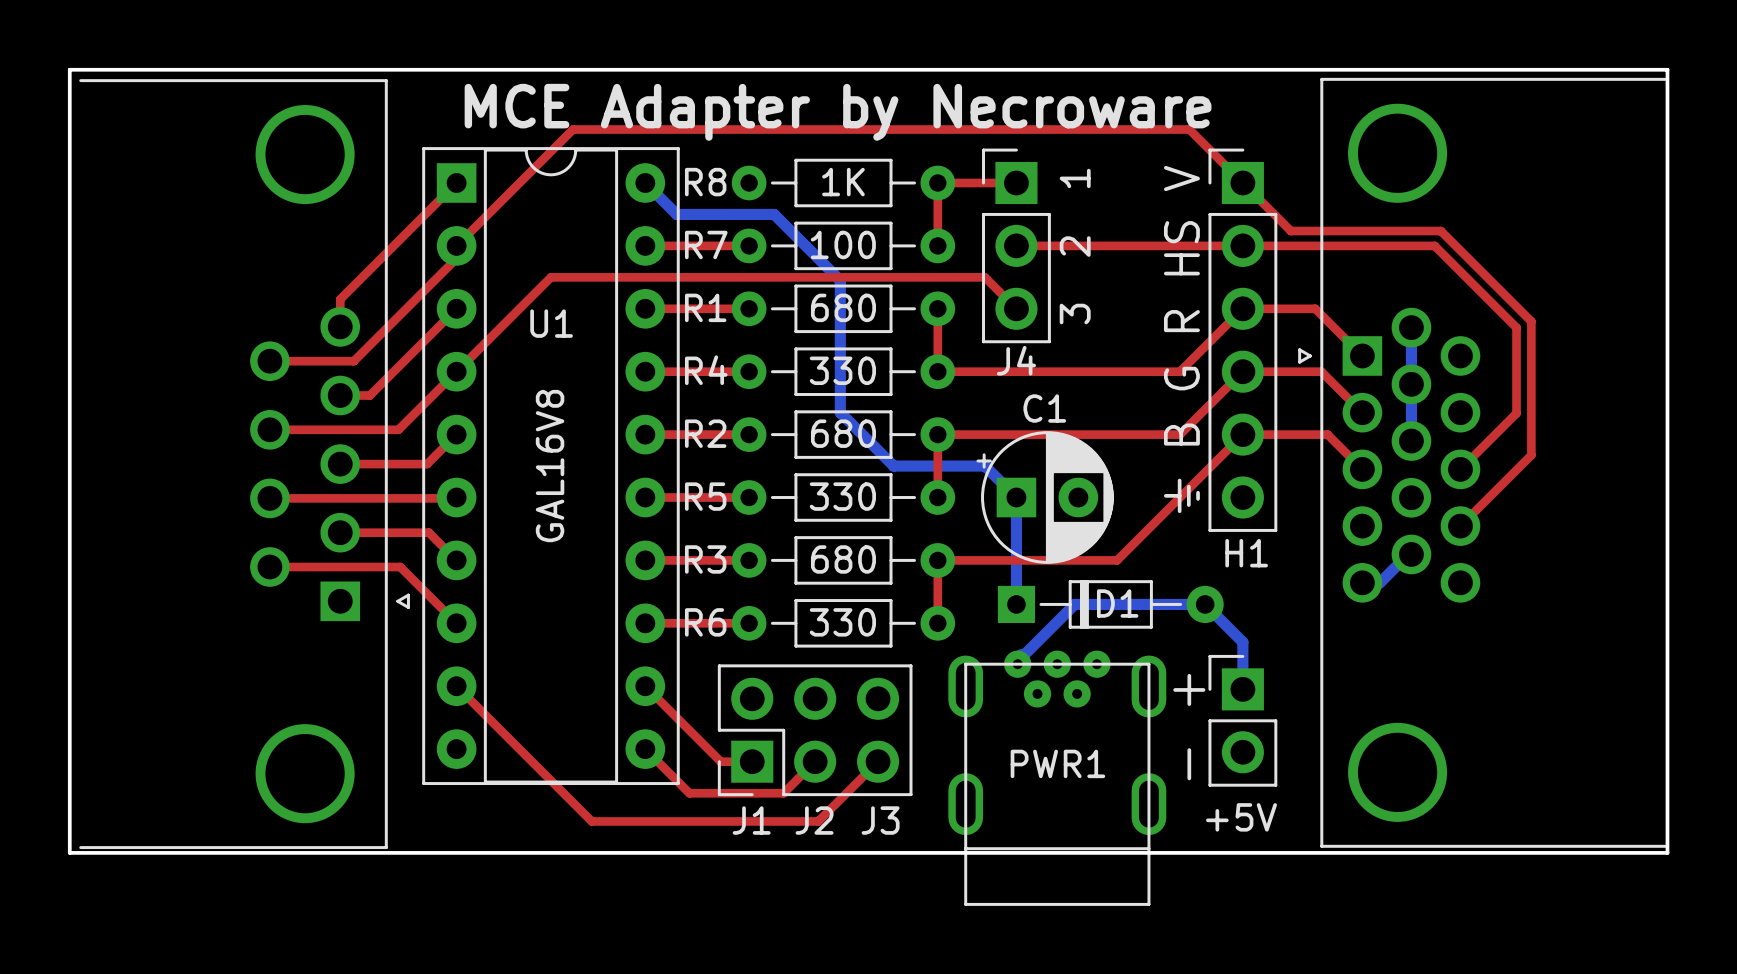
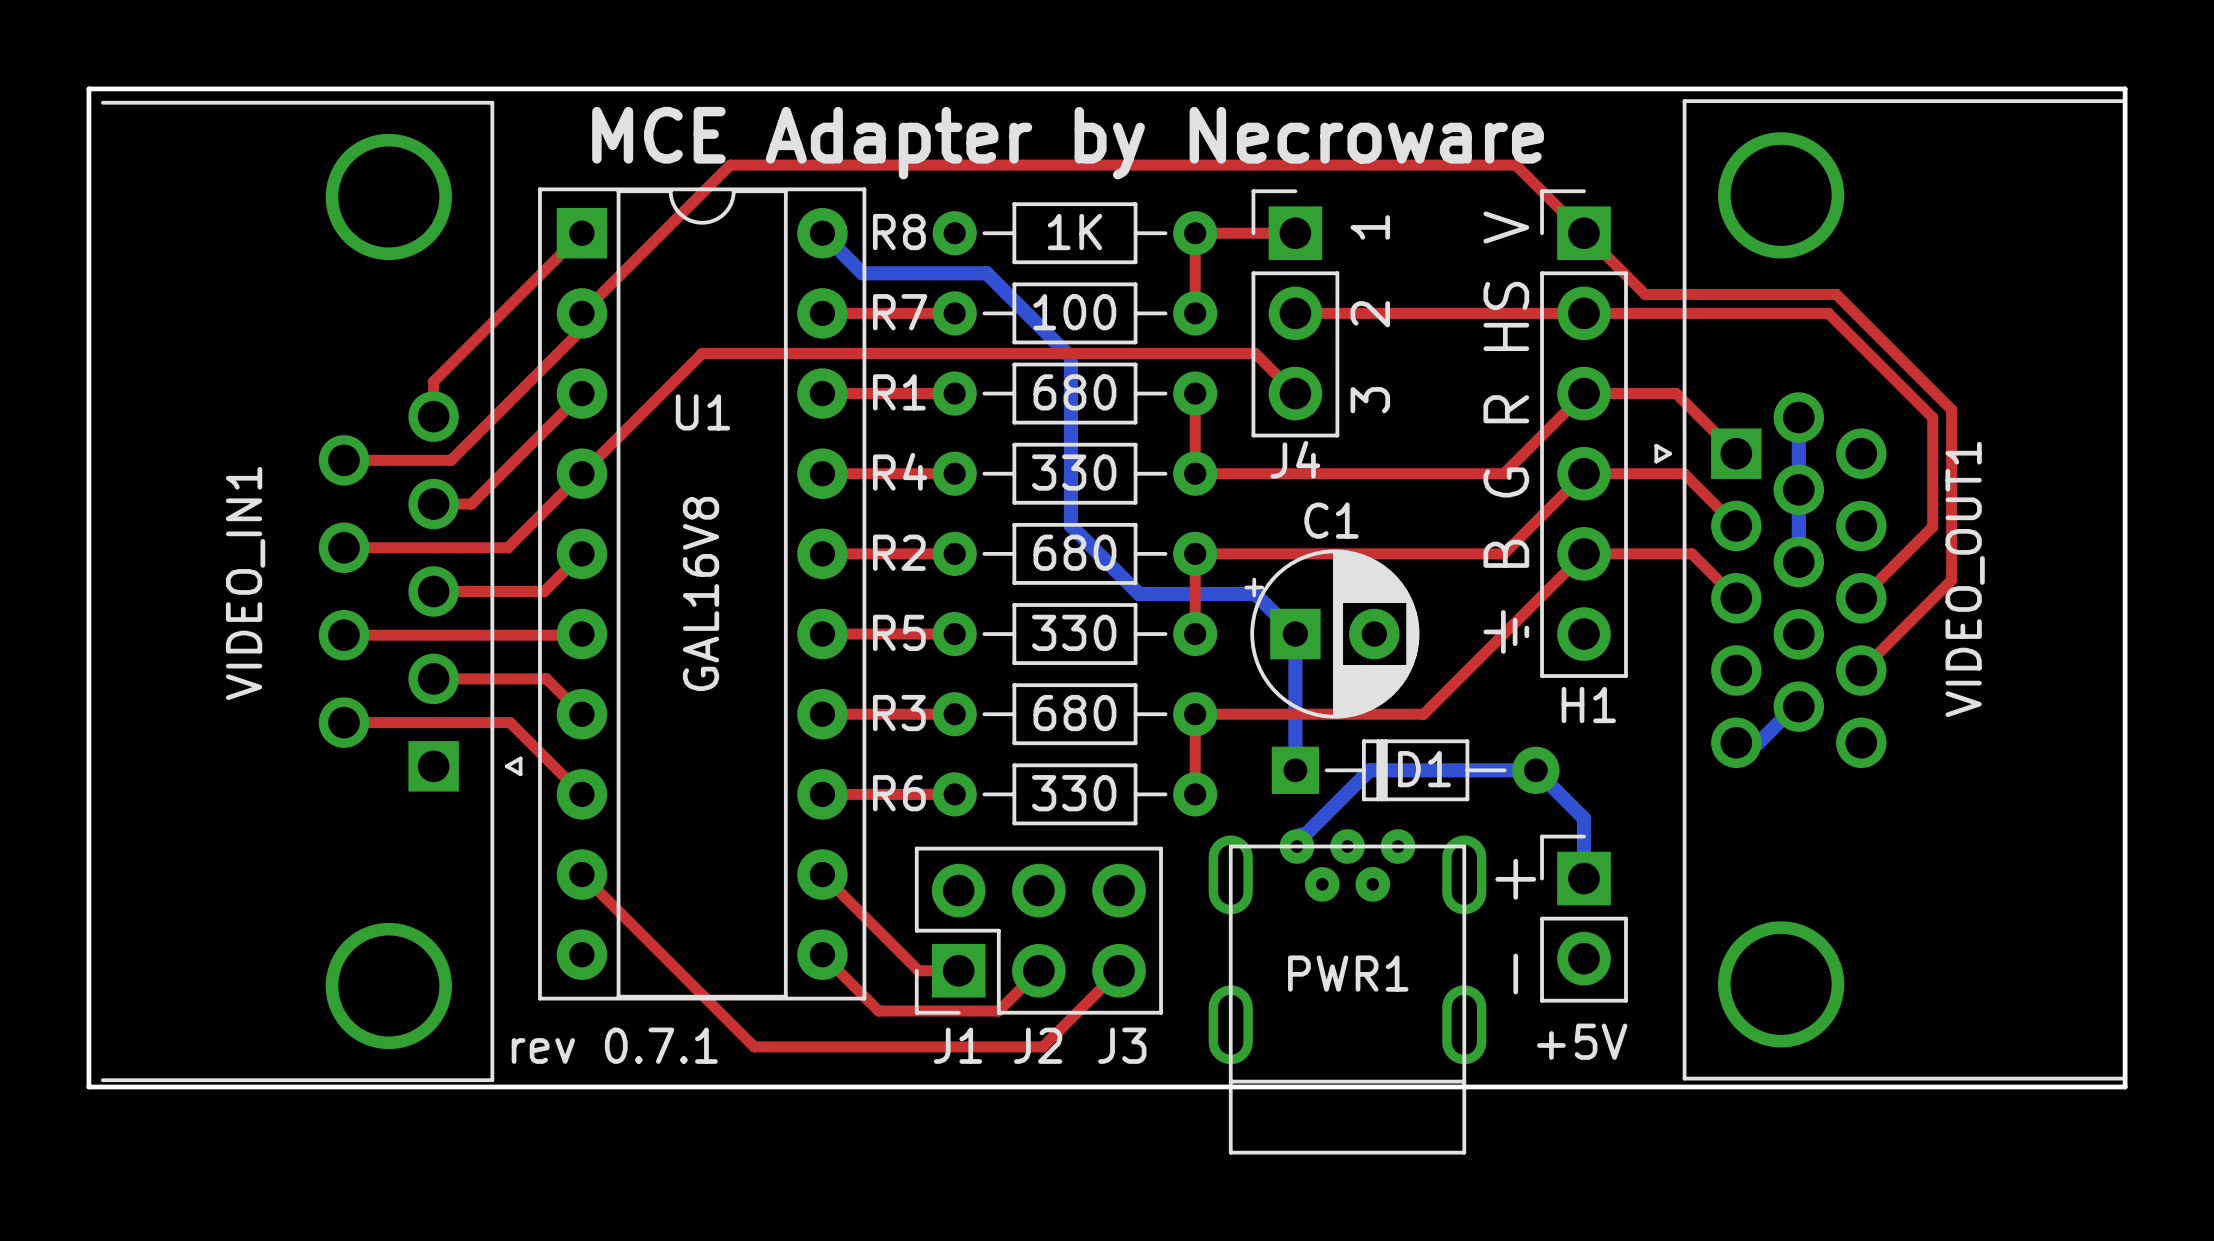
VIDEO_OUT1 name: none -> VIDEO_OUT1 (1965, 579)
VIDEO_IN1 name: none -> VIDEO_IN1 (245, 583)
text: none -> rev 0.7.1 (614, 1045)

